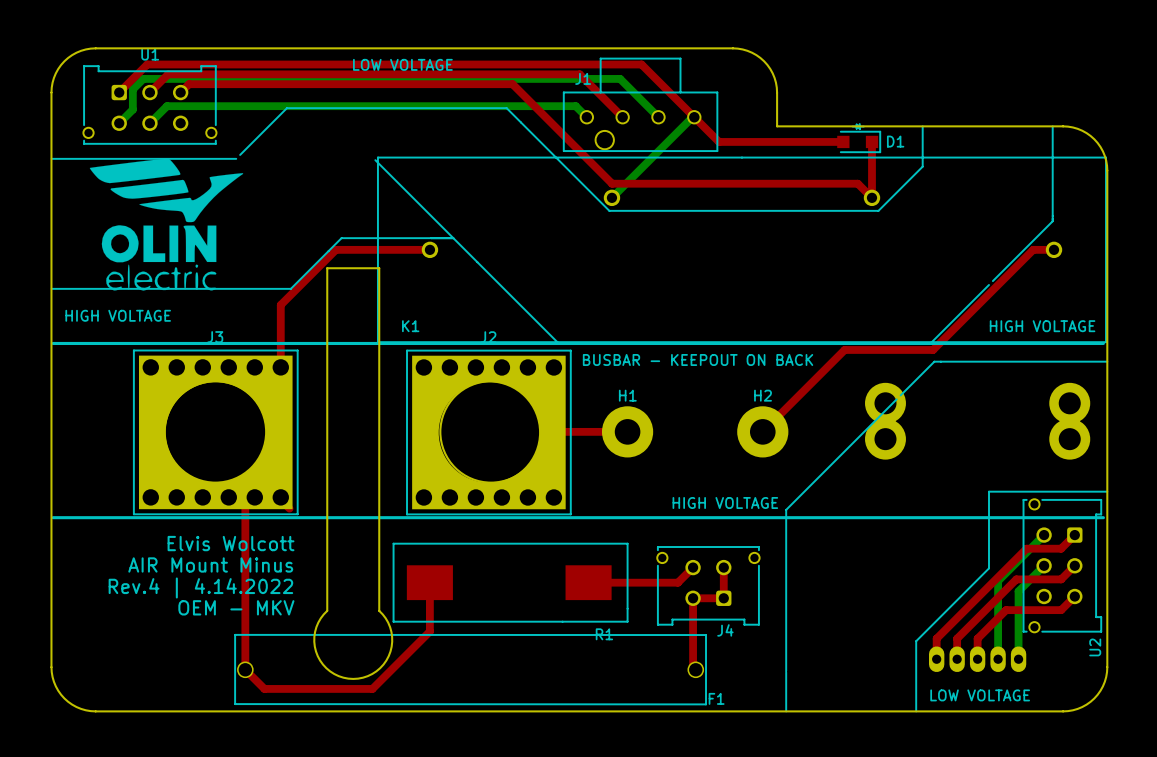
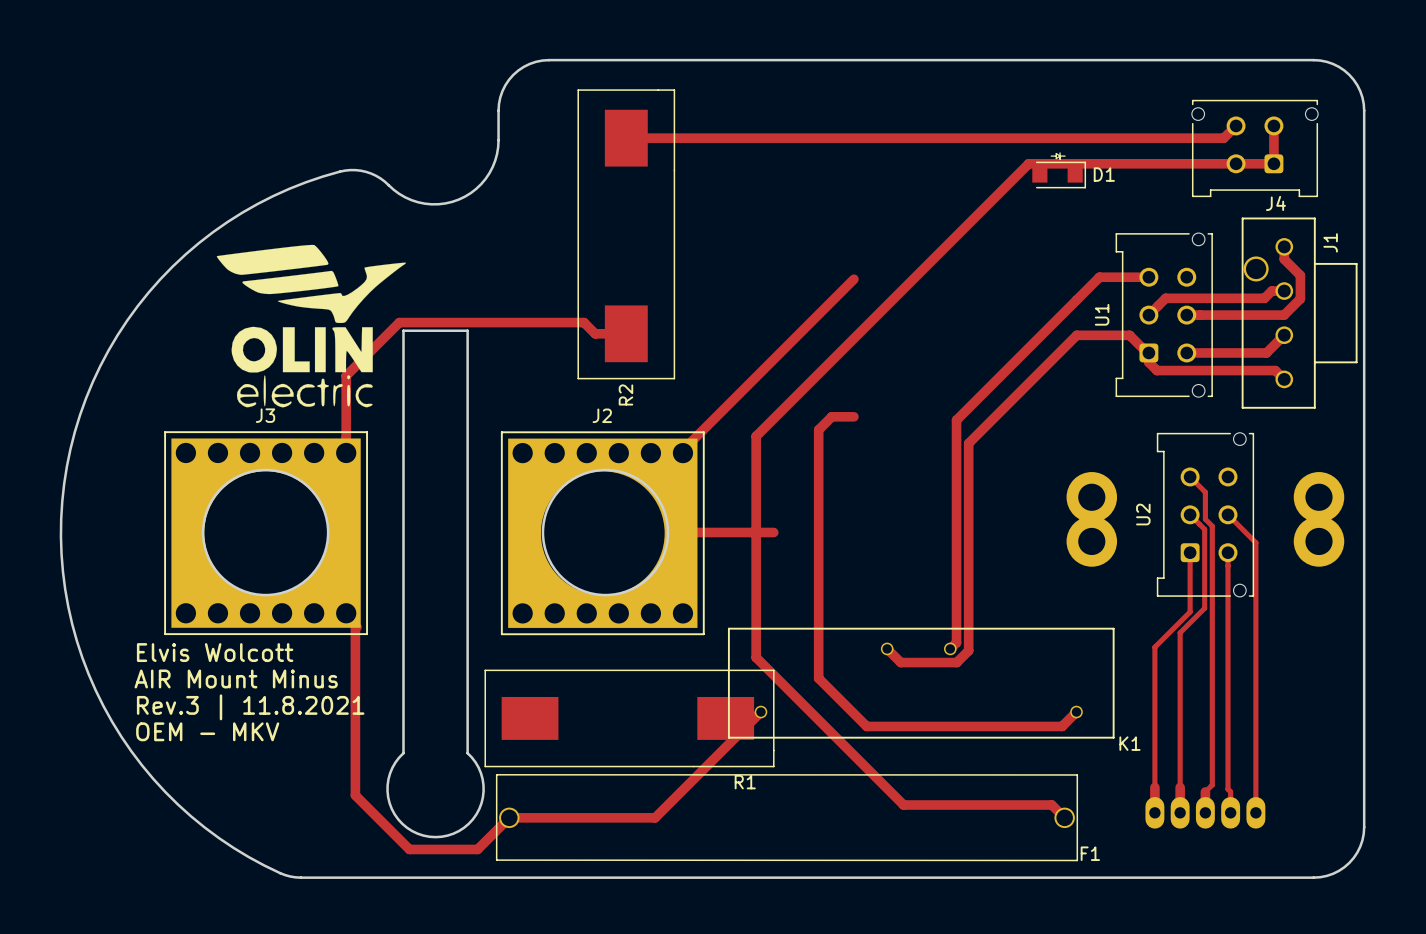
board edge: (95, 48) (737, 48) (747, 50) (760, 57) (772, 73) (776, 87) (777, 126) (1063, 126) (1077, 128) (1086, 133) (1097, 142) (1102, 151) (1107, 170) (1107, 667) (1106, 677) (1100, 690) (1090, 701) (1082, 707) (1063, 711) (95, 711) (85, 710) (72, 704) (58, 690) (53, 681) (51, 667) (51, 92) (53, 77) (64, 61) (81, 50) (95, 48) -> none
board edge: none -> (549, 60) (1313, 60)
board edge: none -> (549, 60) (535, 61) (523, 66) (513, 74) (505, 85) (498, 104) (498, 140)
board edge: none -> (1313, 60) (1333, 63) (1349, 74) (1360, 91) (1364, 110) (1364, 827) (1360, 846) (1349, 862) (1338, 870) (1320, 877) (295, 877) (280, 873) (248, 857) (218, 838) (191, 816) (153, 779) (121, 736) (95, 690) (82, 657) (72, 624) (62, 571) (60, 536) (62, 501) (70, 449) (80, 415) (92, 382) (108, 350) (127, 320) (160, 279) (199, 243) (242, 212) (289, 188) (322, 176) (350, 170) (366, 171) (375, 175) (399, 193) (418, 202) (438, 204) (452, 201) (470, 193) (485, 178) (495, 160) (498, 140)
text: LOW VOLTAGE (402, 64) -> none
top track: (119, 92) (147, 64) (641, 64) (719, 141) (843, 141) -> none
top track: (149, 92) (168, 74) (579, 74) (622, 117) -> none
top track: (180, 92) (189, 84) (512, 84) (612, 183) (857, 183) (871, 197) (871, 141) -> none
top track: none -> (1236, 125) (1223, 138) (626, 138)
top track: none -> (1273, 125) (1273, 163) (1028, 163) (756, 436) (756, 657) (903, 805) (1051, 805) (1064, 817)
U1 rotation: 0° (149, 104) -> 90° counterclockwise (1164, 315)
U1 position: (149, 104) -> (1164, 315)
J1 rotation: 0° (640, 104) -> 90° clockwise (1299, 313)
J1 position: (640, 104) -> (1299, 313)
bottom track: (586, 117) (575, 106) (167, 106) (149, 123) -> none
bottom track: (658, 117) (620, 78) (143, 78) (132, 89) (132, 109) (119, 123) -> none
bottom track: (694, 117) (611, 197) -> none
line: (922, 126) (922, 166) (878, 210) (609, 210) (506, 108) (286, 108) (240, 154) -> none
line: (1052, 126) (1052, 221) (992, 281) -> none
K1 footprint: [377, 156, 1107, 343] -> [727, 627, 1115, 739]
line: (51, 158) (236, 158) -> none
line: (375, 160) (557, 342) -> none
R2: none -> (626, 234)
top track: none -> (1284, 246) (1284, 259) (1300, 275) (1300, 298) (1284, 315) (1186, 315)
drawing position: (166, 224) -> (311, 326)
top track: none -> (1148, 277) (1099, 277) (956, 420) (956, 642) (950, 648)
top track: none -> (853, 279) (682, 450) (682, 453)
top track: none -> (1284, 291) (1271, 291) (1264, 298) (1165, 298) (1148, 315)
line: (453, 238) (341, 238) (290, 288) (51, 288) -> none
top track: (429, 249) (335, 249) (280, 305) -> (626, 333) (595, 333) (584, 322) (399, 322) (346, 376)
top track: (1054, 249) (1033, 249) (933, 349) (844, 349) (762, 431) -> none
top track: none -> (1284, 335) (1266, 352) (1186, 352)
line: (989, 284) (930, 343) -> none
top track: none -> (1284, 379) (1275, 370) (1157, 370) (1148, 362) (1148, 352) (1129, 335) (1076, 335) (968, 443) (968, 650) (956, 662) (900, 662) (887, 648)
text: HIGH VOLTAGE (118, 315) -> none
K1 name position: K1 (410, 326) -> K1 (1129, 743)
text: HIGH VOLTAGE (1042, 326) -> none
top track: none -> (853, 416) (831, 416) (818, 429) (818, 678) (866, 726) (1062, 726) (1076, 712)
line: (53, 343) (1103, 343) -> none
text: BUSBAR - KEEPOUT ON BACK (698, 359) -> none
line: (1107, 361) (934, 361) (900, 395) -> none
line: (896, 399) (786, 509) (786, 671) -> none
top track: none -> (1227, 514) (1255, 542) (1255, 812)
H1: (627, 431) -> none
H2: (762, 431) -> none
top track: none -> (1227, 552) (1227, 789) (1230, 791) (1230, 812)
top track: (243, 480) (245, 669) (264, 688) (332, 688) -> (355, 625) (355, 795) (409, 849)
line: (1107, 491) (989, 491) (989, 568) (916, 641) (916, 711) -> none
text: HIGH VOLTAGE (725, 503) -> none
line: (53, 517) (1103, 517) -> none
bottom track: (1044, 535) (998, 581) (998, 659) -> none
top track: (1074, 535) (1061, 548) (1026, 548) (936, 638) -> (1190, 552) (1190, 612) (1154, 647) (1154, 787)
text position: Elvis Wolcott (231, 543) -> Elvis Wolcott (215, 652)
text position: AIR Mount Minus (210, 564) -> AIR Mount Minus (236, 678)
bottom track: (1044, 565) (1018, 591) (1018, 659) -> none
U2 rotation: 0° (1062, 565) -> 180° (1205, 514)
U2 position: (1062, 565) -> (1205, 514)
top track: (1074, 565) (1061, 579) (1016, 579) (957, 638) -> (1190, 514) (1204, 529) (1204, 608) (1180, 632) (1180, 787)
top track: (693, 567) (677, 582) (588, 582) -> none
top track: (723, 567) (723, 598) (693, 598) (693, 667) (695, 669) -> none
top track: (429, 582) (429, 631) (372, 688) -> (760, 712) (655, 817) (509, 817) (477, 849) (459, 849)
J4 position: (708, 585) -> (1255, 148)
text: Rev.4 | 4.14.2022 (200, 587) -> Rev.3 | 11.8.2021 (250, 707)
top track: (1074, 596) (1061, 610) (1006, 610) (977, 638) (977, 642) -> (1190, 476) (1205, 492) (1205, 519) (1212, 526) (1212, 784) (1205, 791)
text position: OEM - MKV (236, 607) -> OEM - MKV (207, 731)
U2 name position: U2 (1095, 647) -> U2 (1143, 514)
F1 position: (470, 669) -> (786, 817)
line: (786, 672) (786, 711) -> none
text: LOW VOLTAGE (980, 695) -> none

